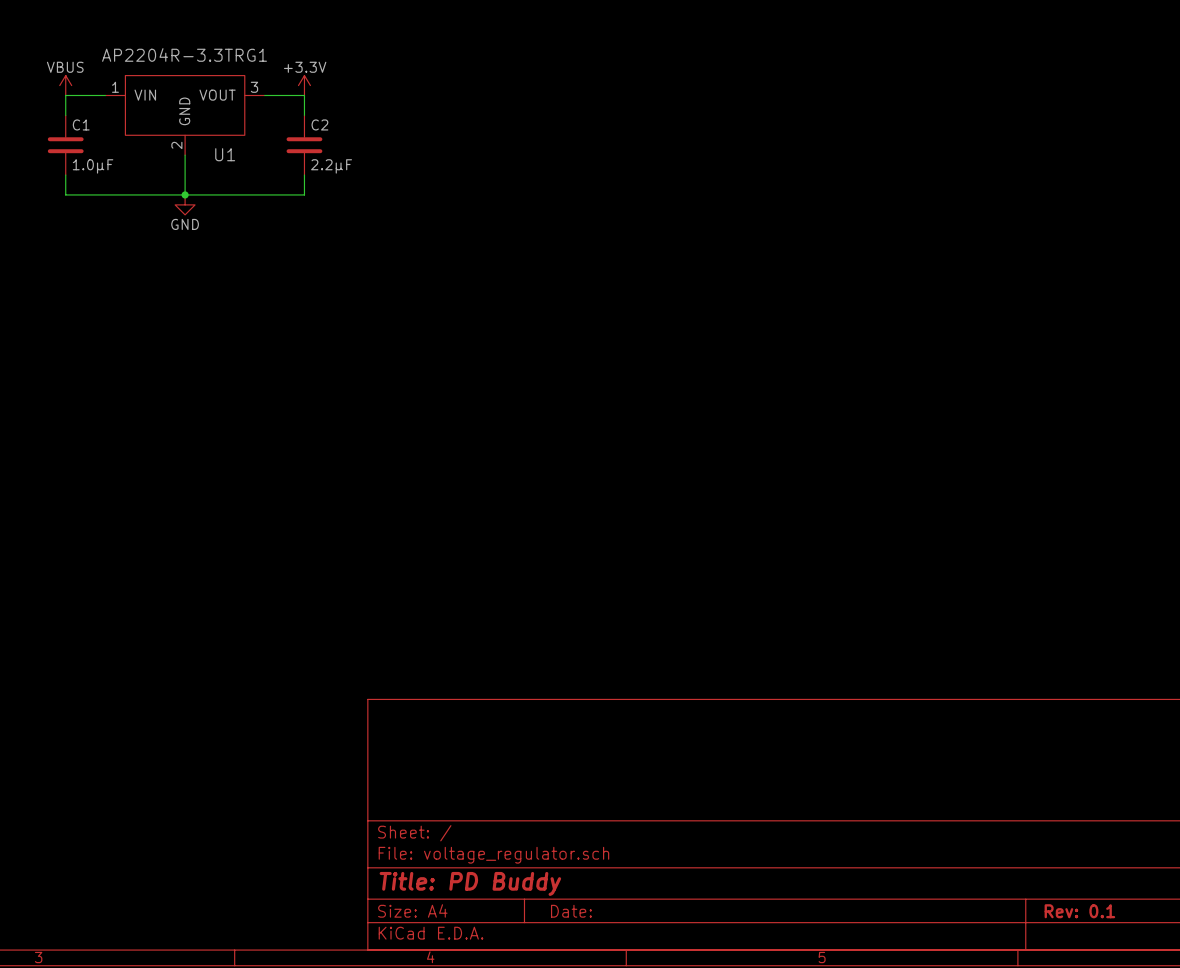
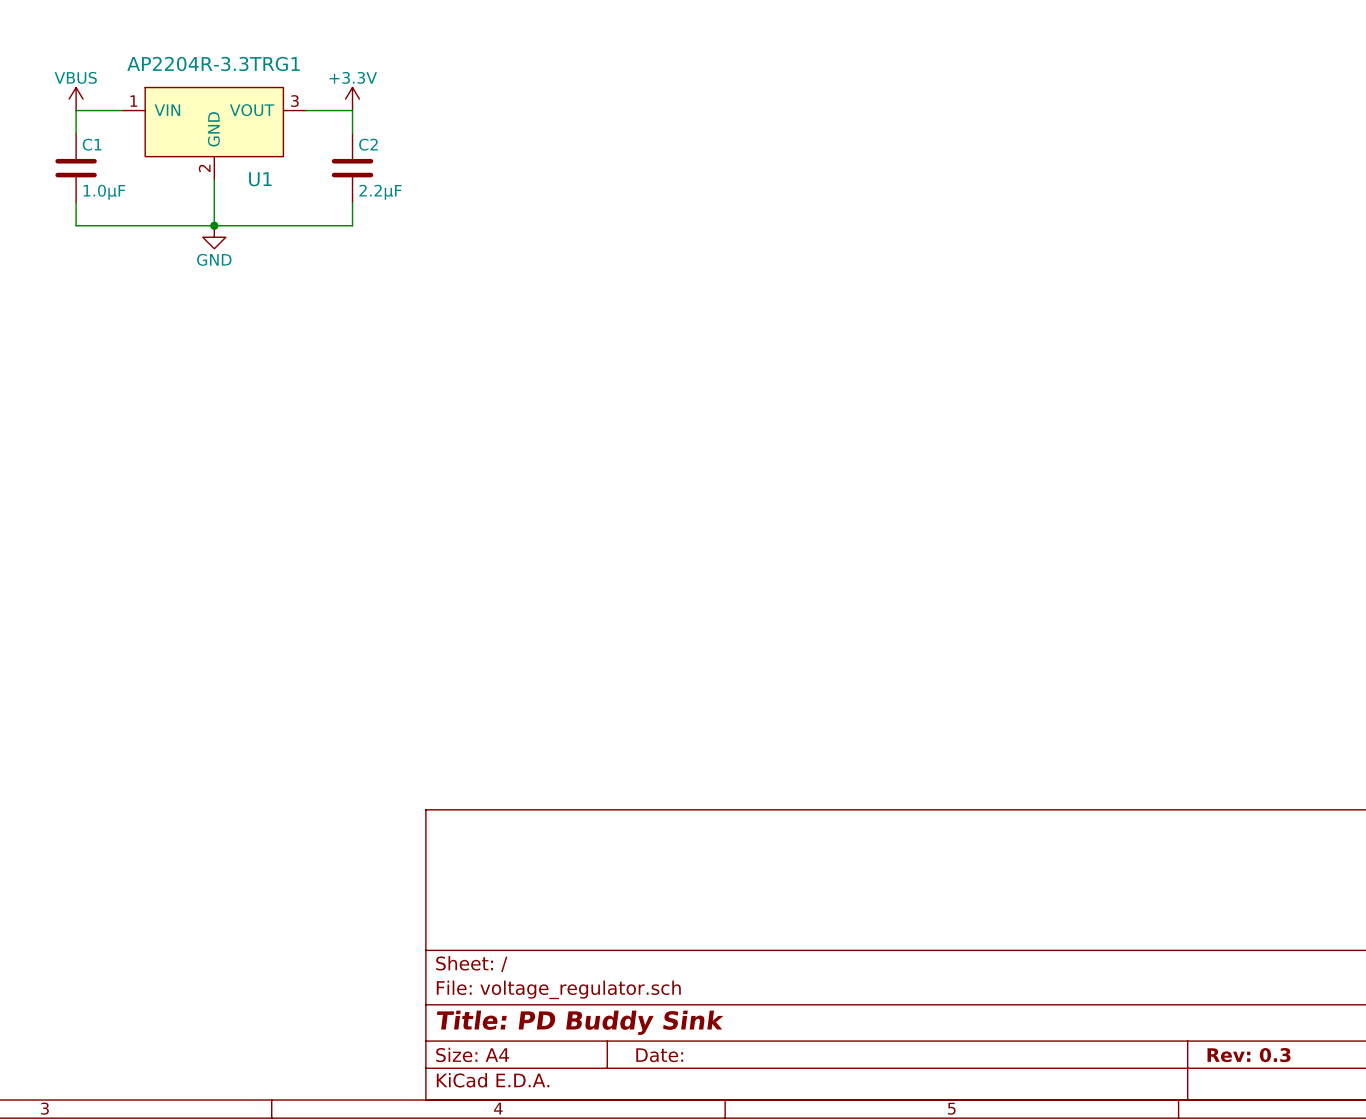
title block: Title: PD Buddy (470, 883) -> Title: PD Buddy Sink (580, 1022)
title block: Rev: 0.1 (1079, 911) -> Rev: 0.3 (1249, 1055)

